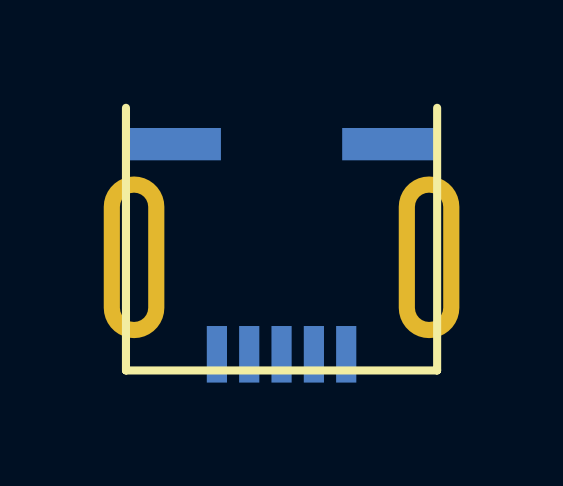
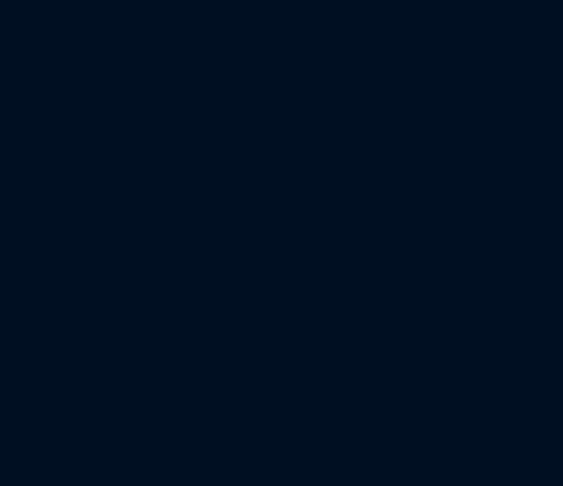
part: (281, 243) -> none

